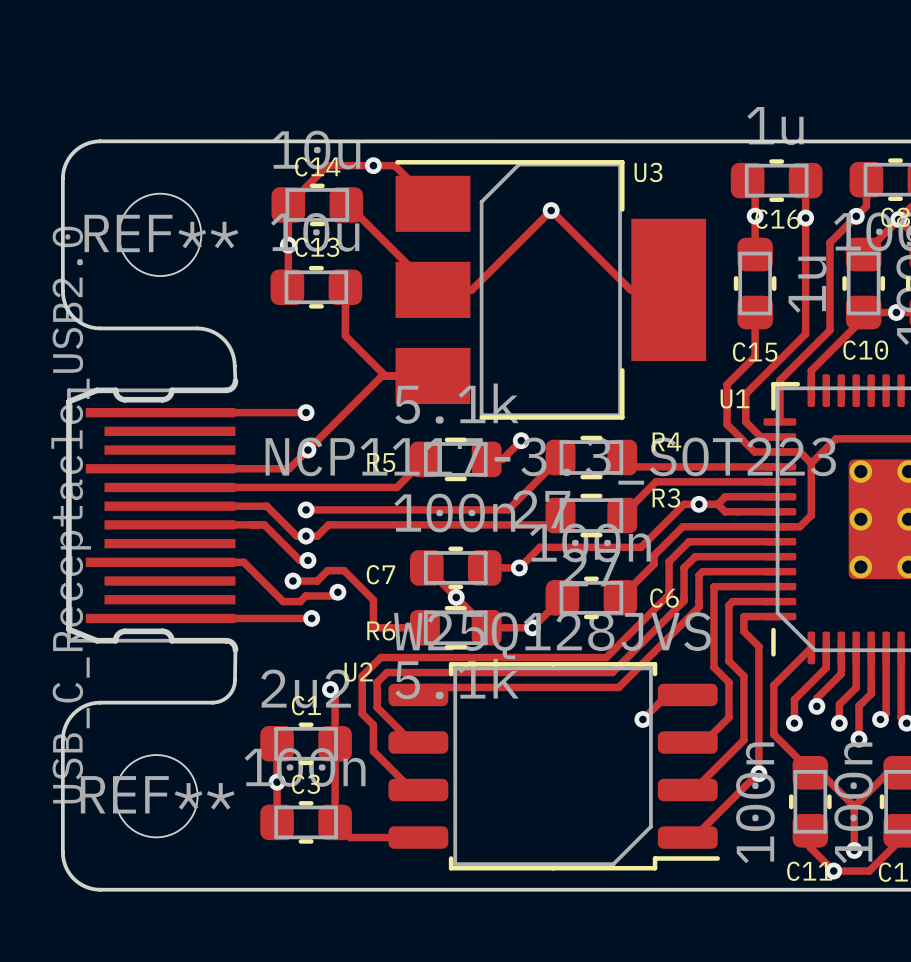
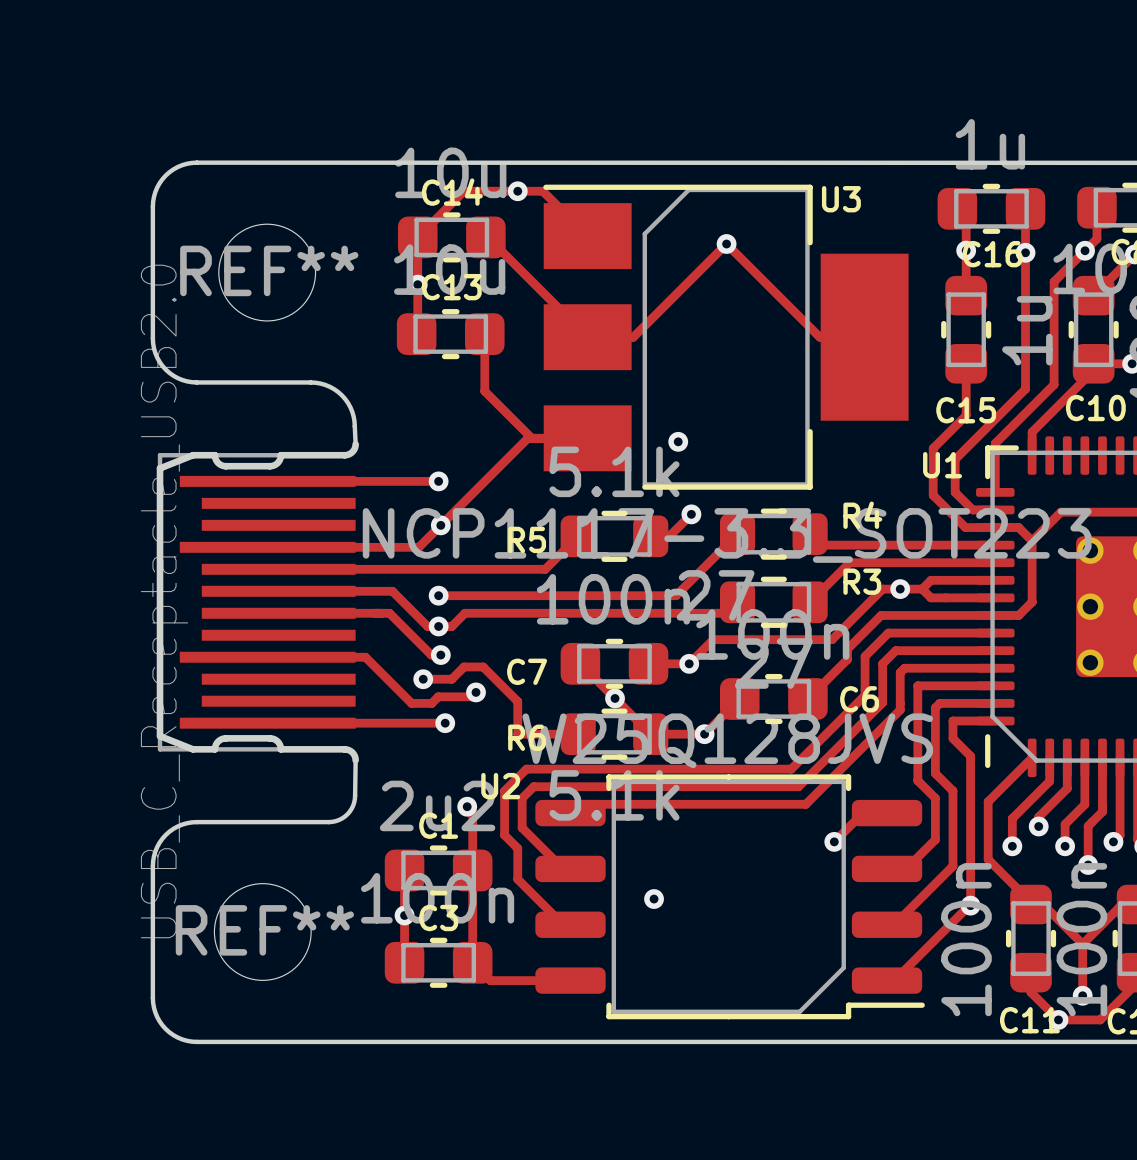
via: none -> (678, 441)
via: none -> (654, 899)

